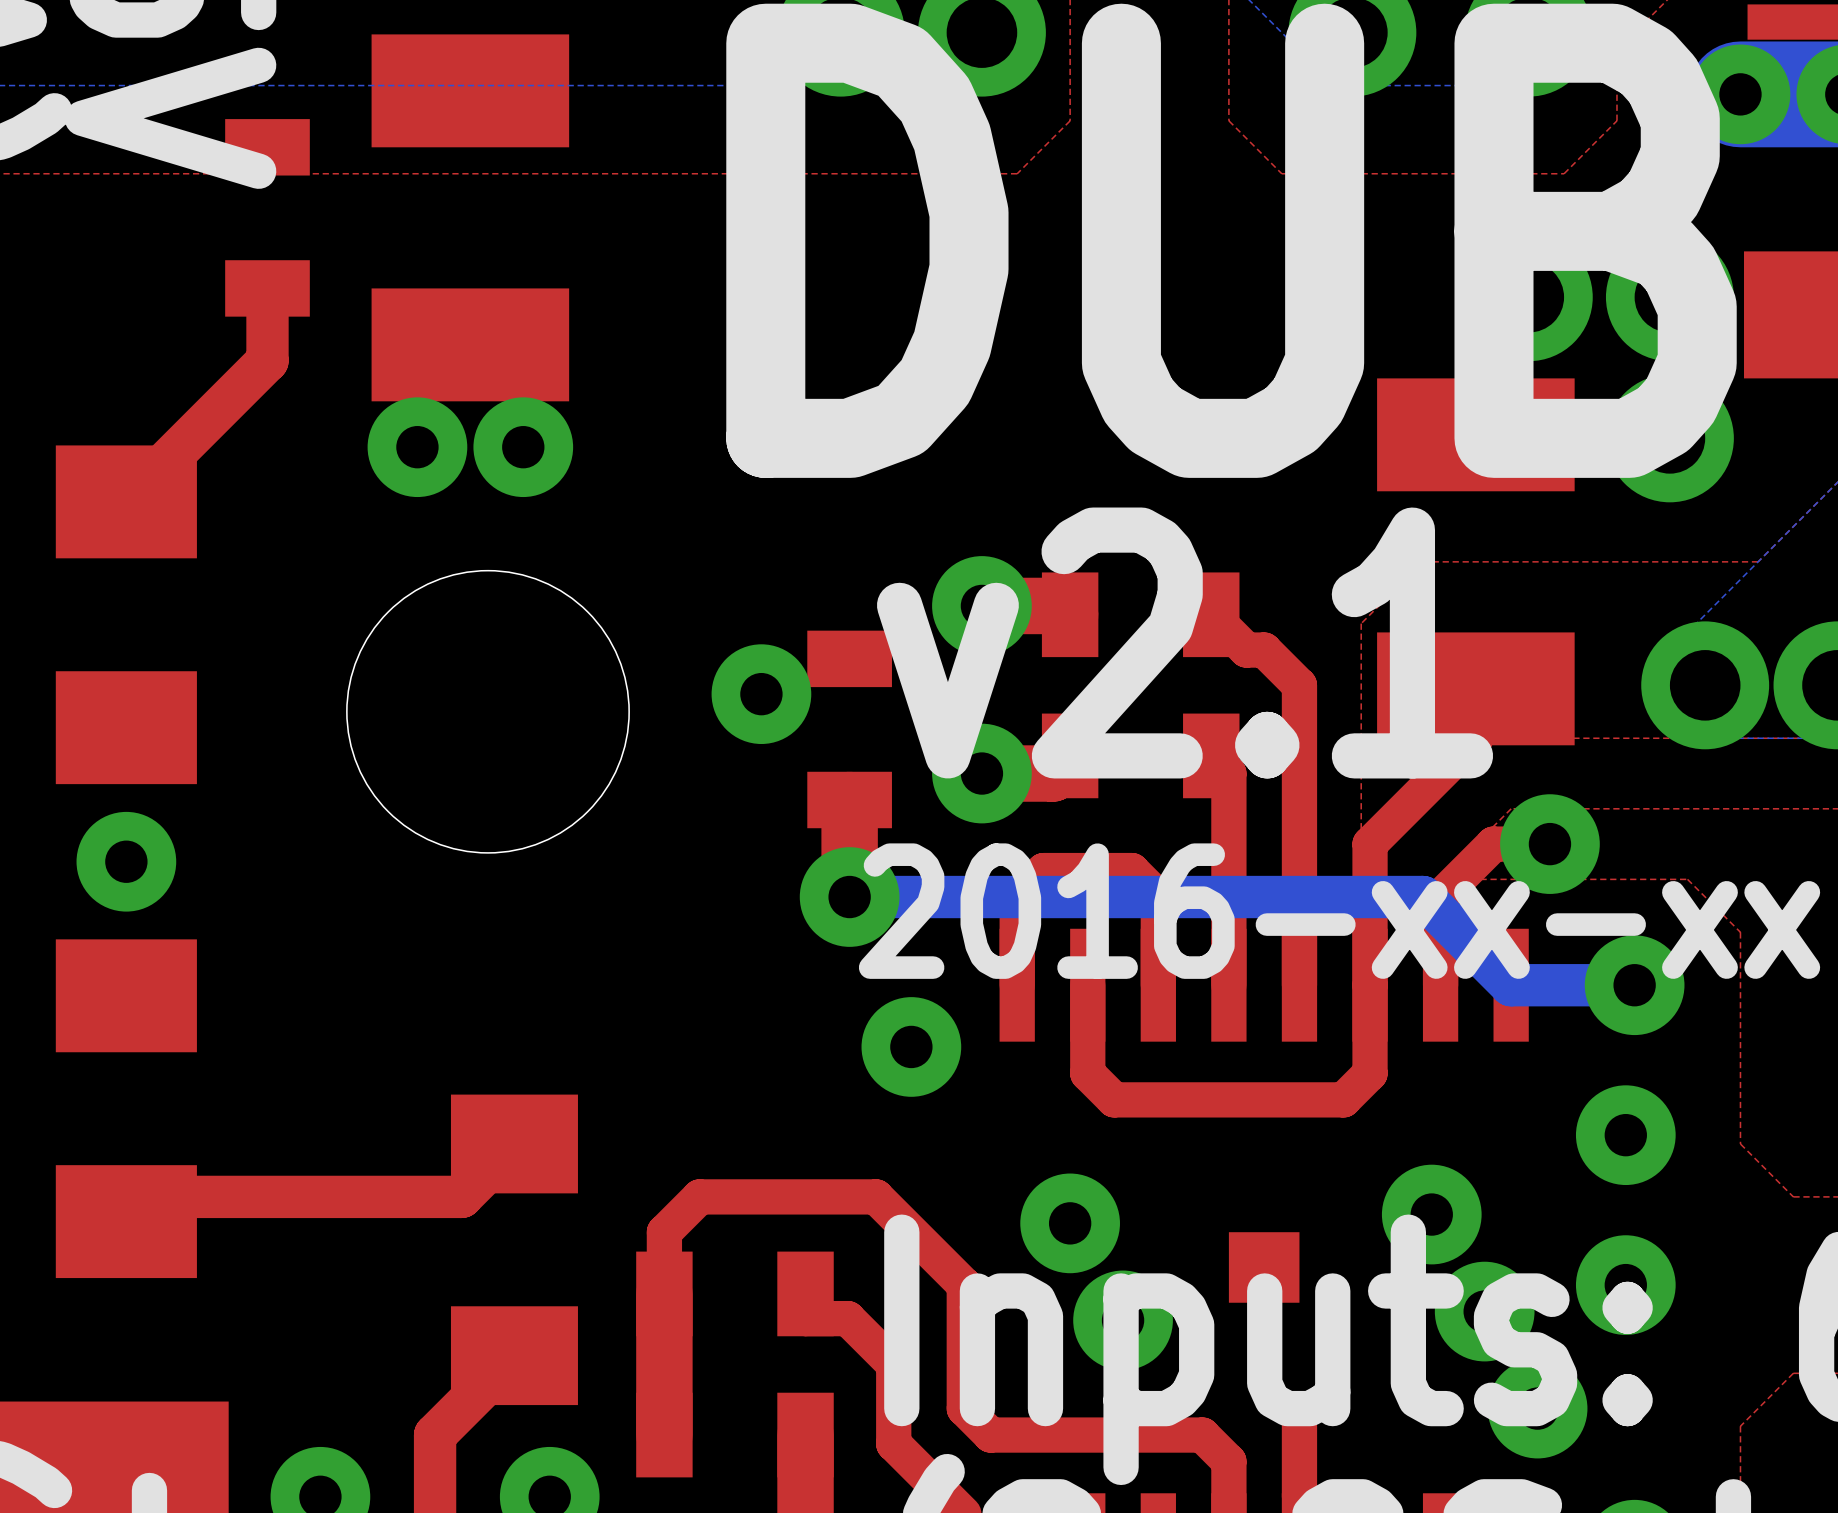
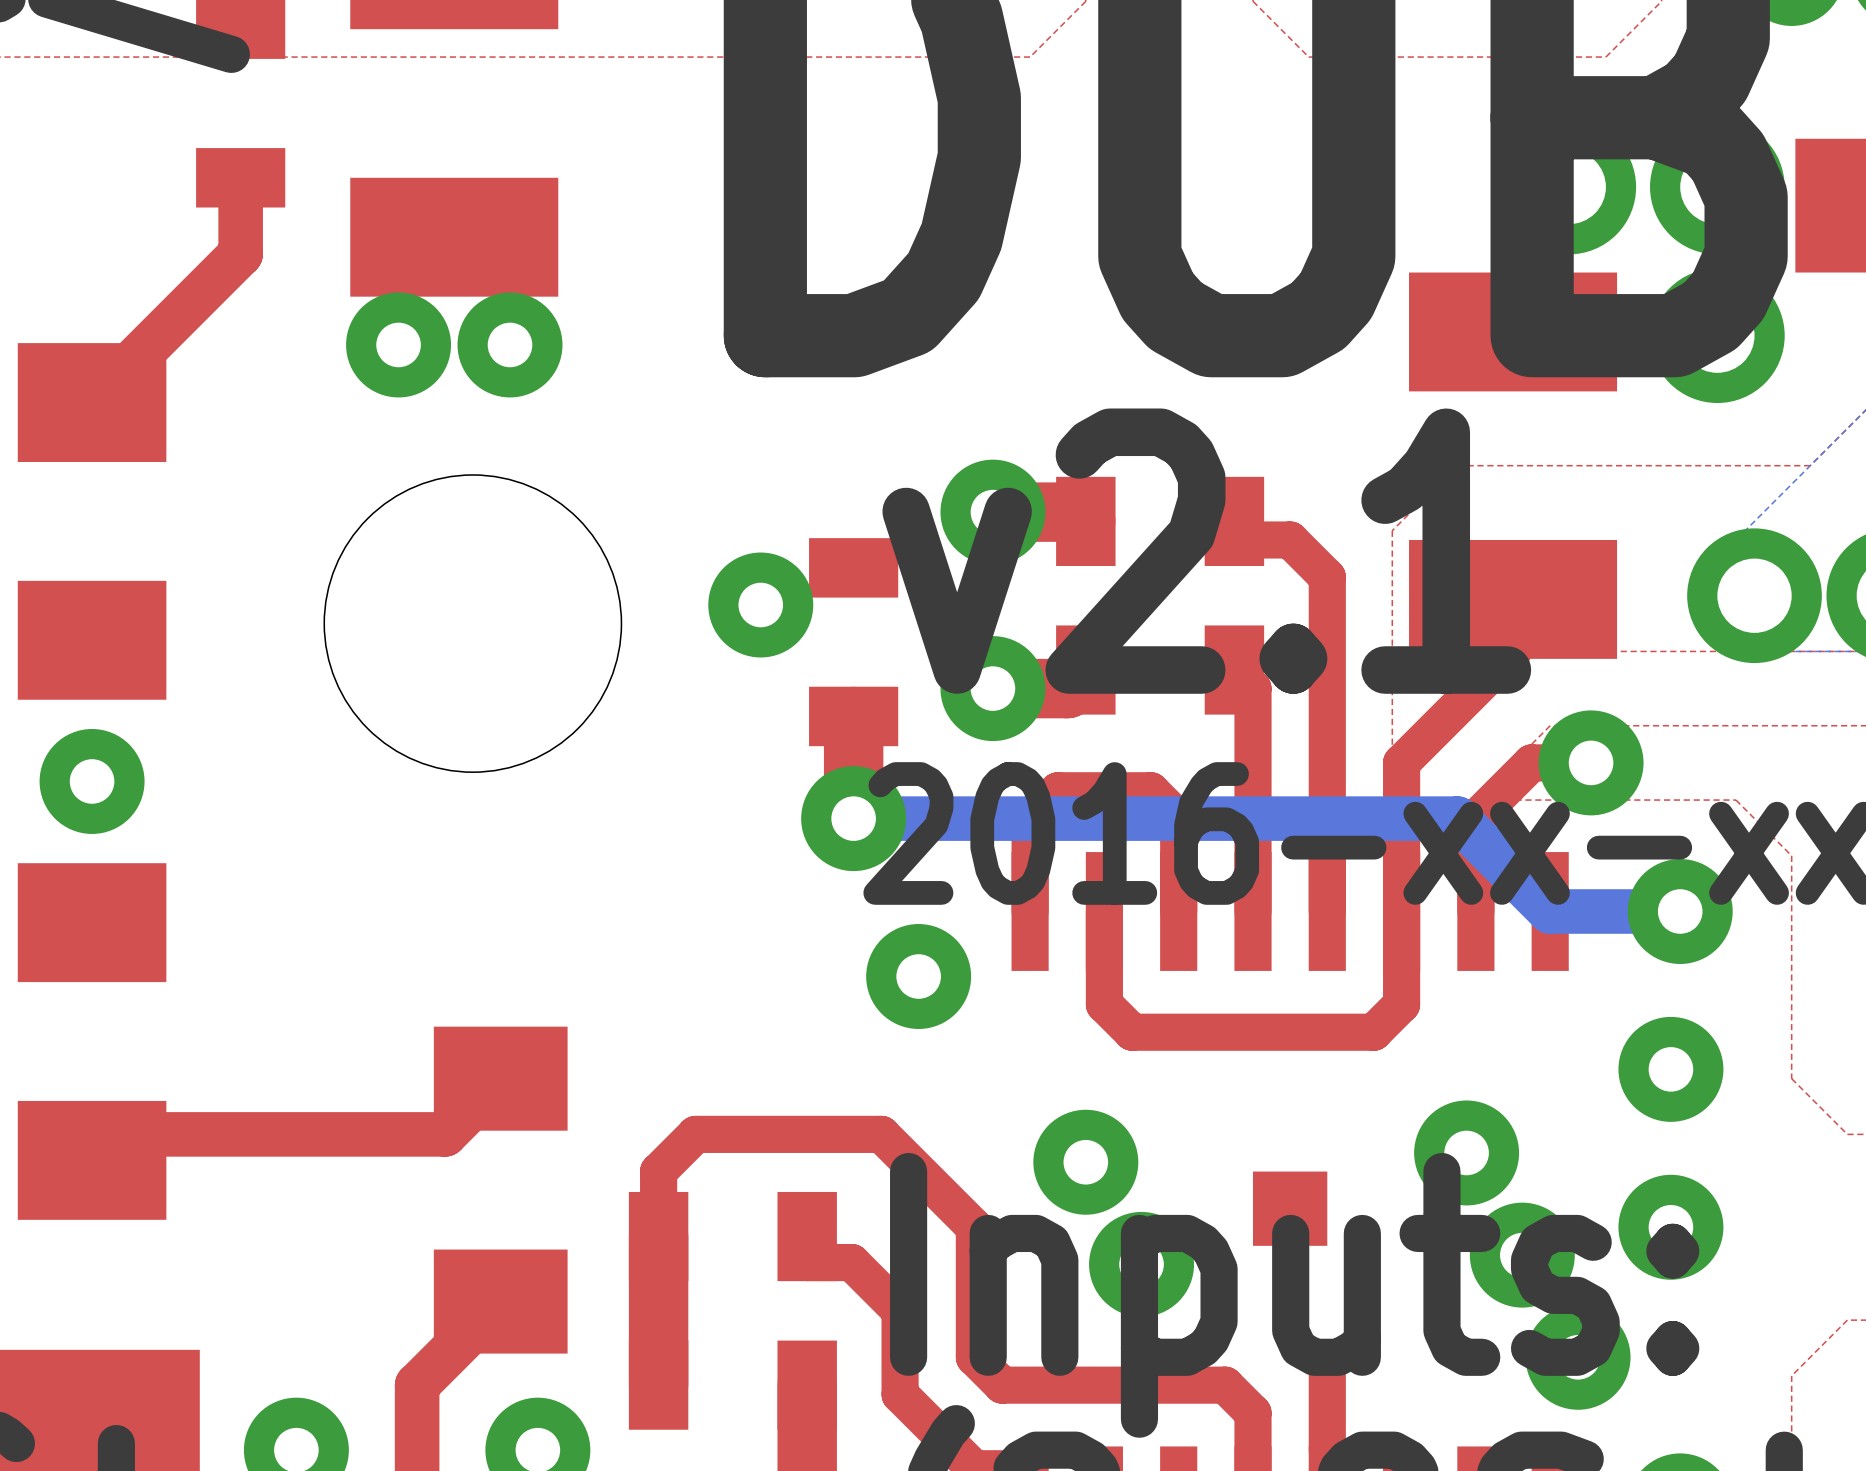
top track: (1228, 632) (1246, 650) (1264, 650) (1299, 685) -> (1252, 539) (1290, 539) (1327, 577) (1327, 595)

